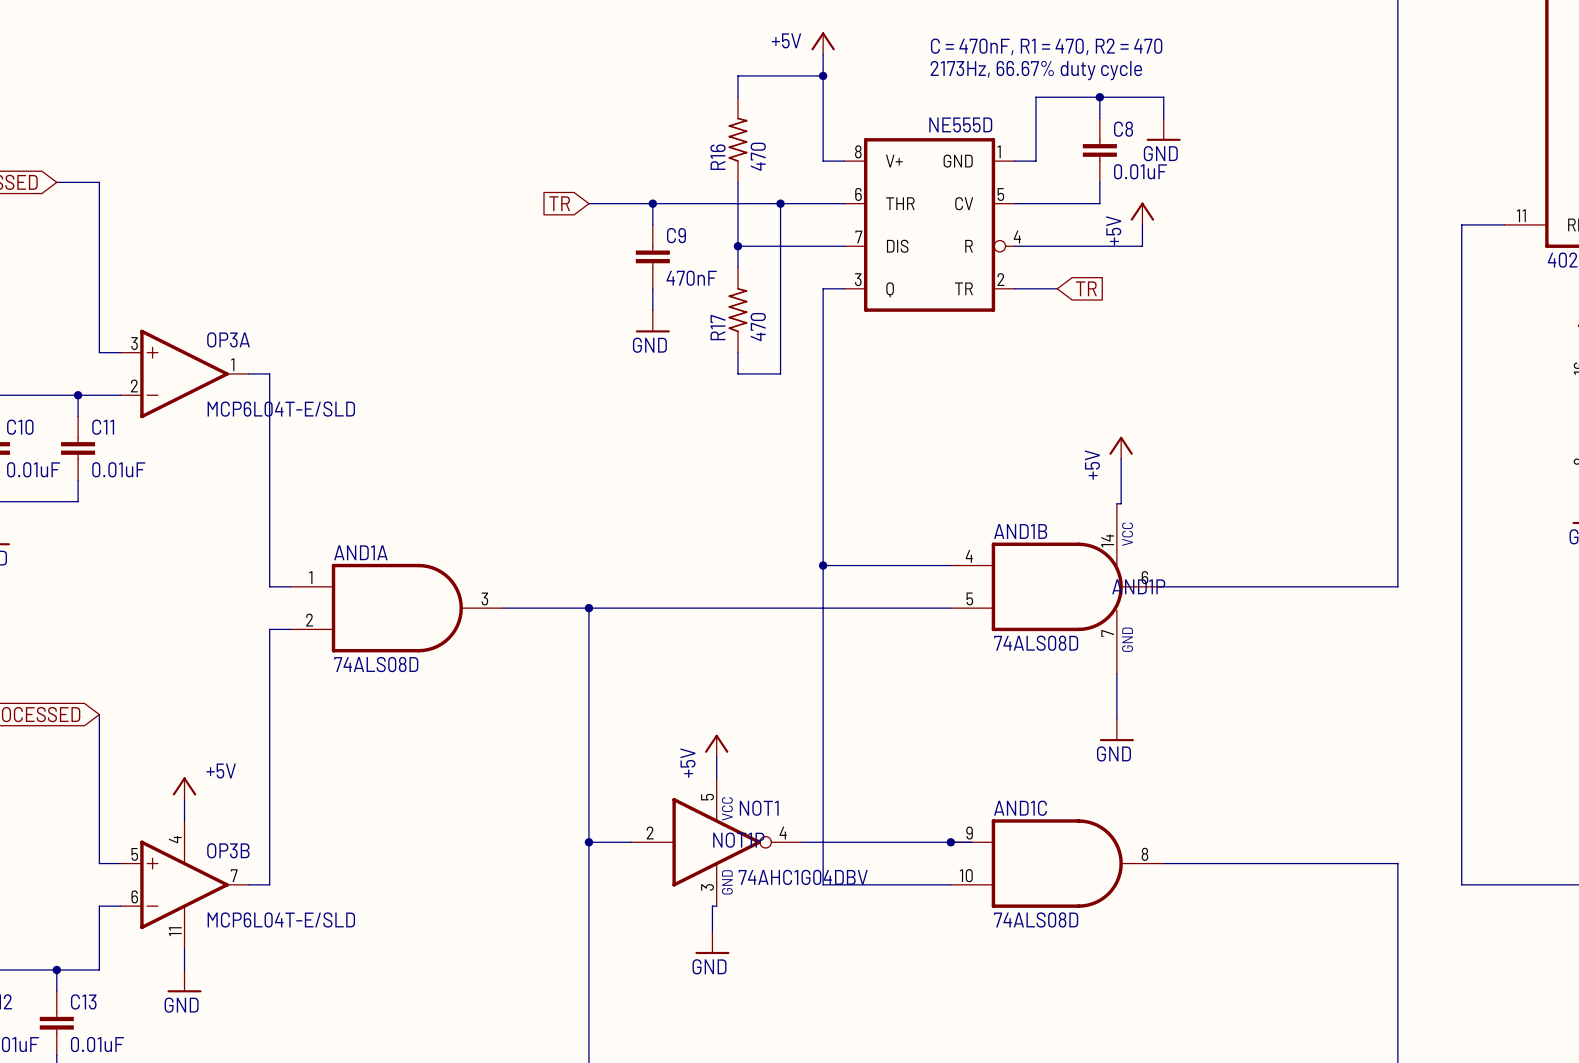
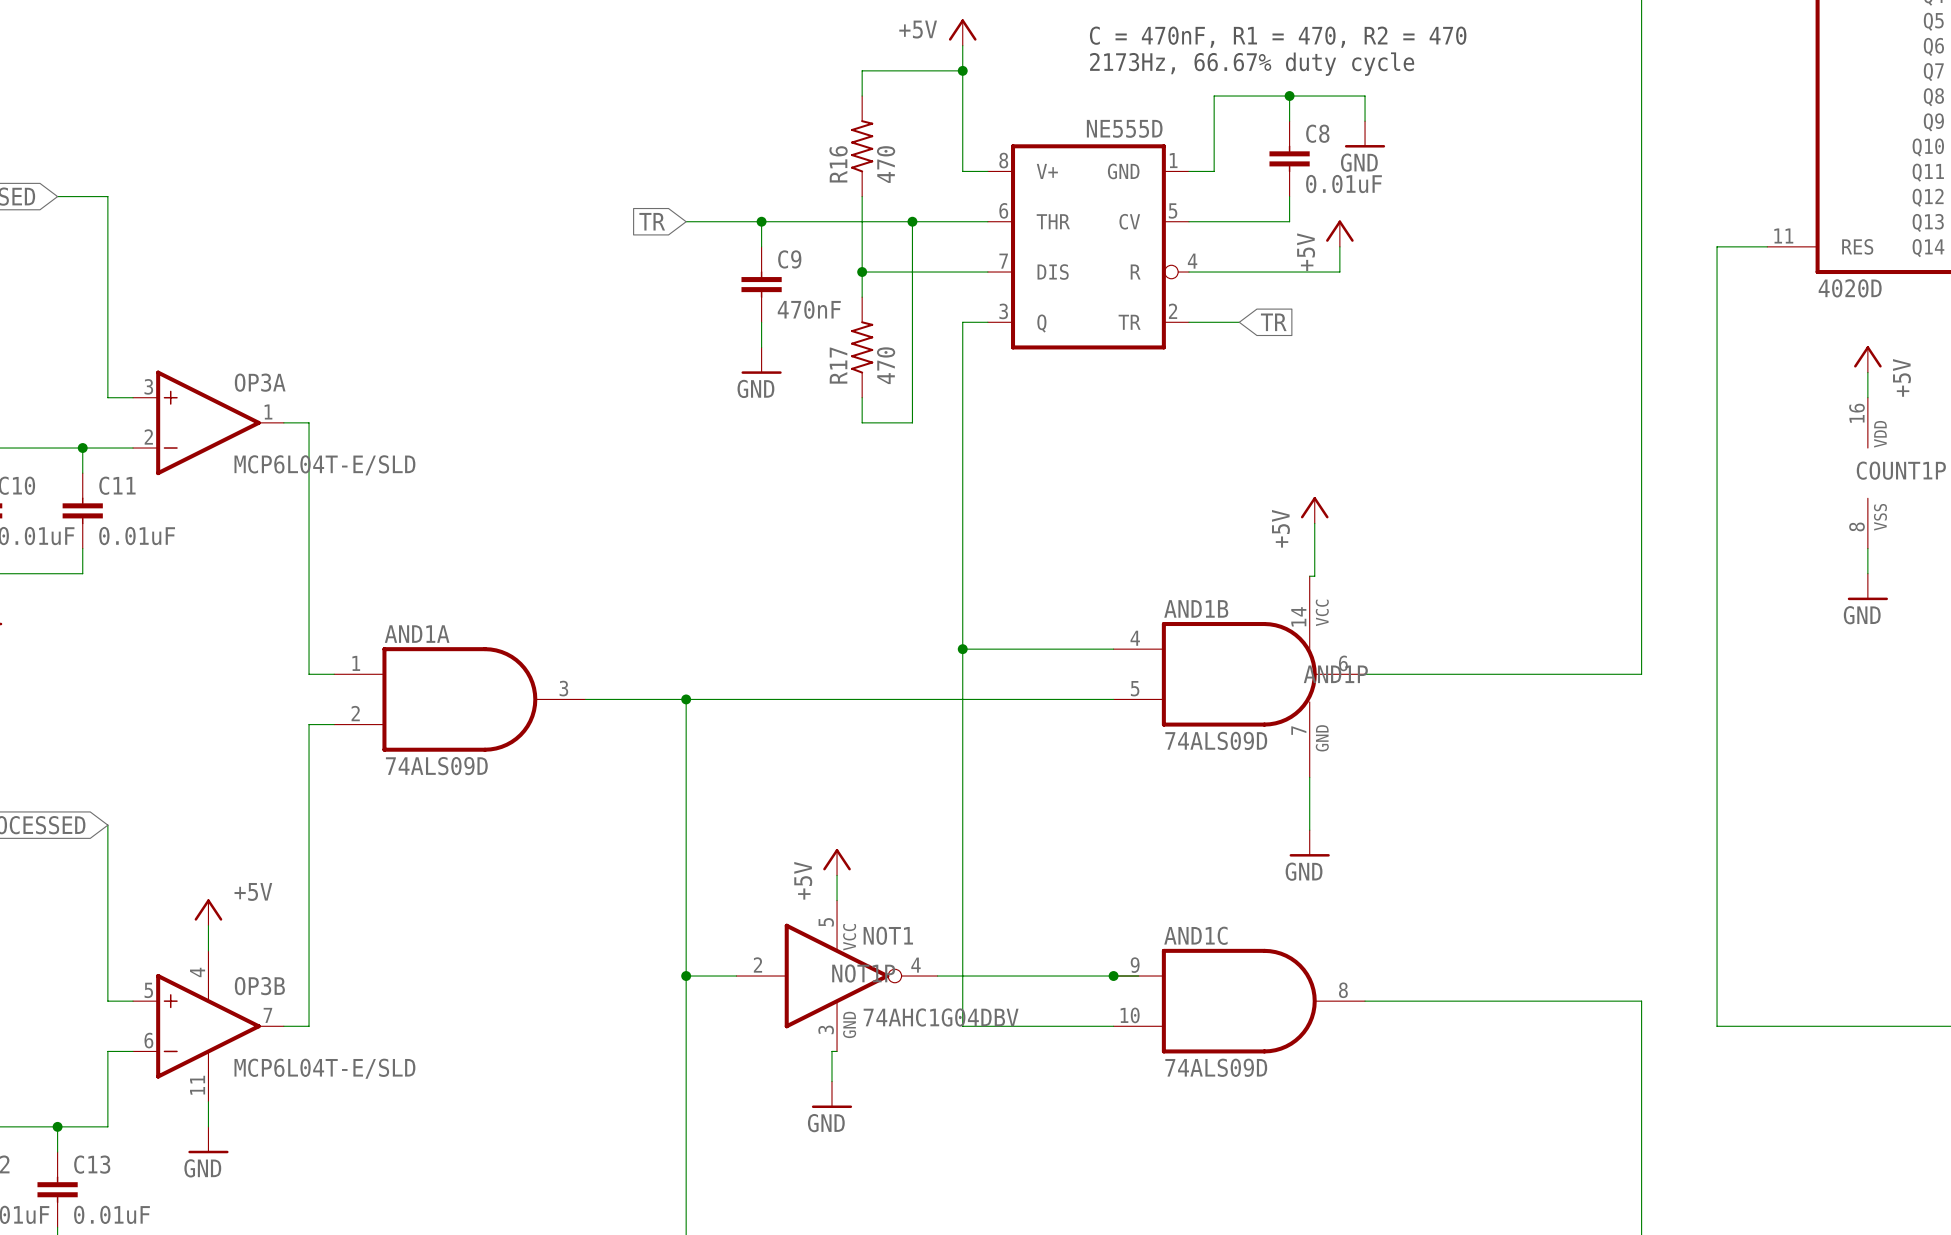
AND1B value: 74ALS08D (1036, 643) -> 74ALS09D (1216, 740)
AND1A value: 74ALS08D (376, 664) -> 74ALS09D (436, 766)
AND1C value: 74ALS08D (1036, 919) -> 74ALS09D (1216, 1067)

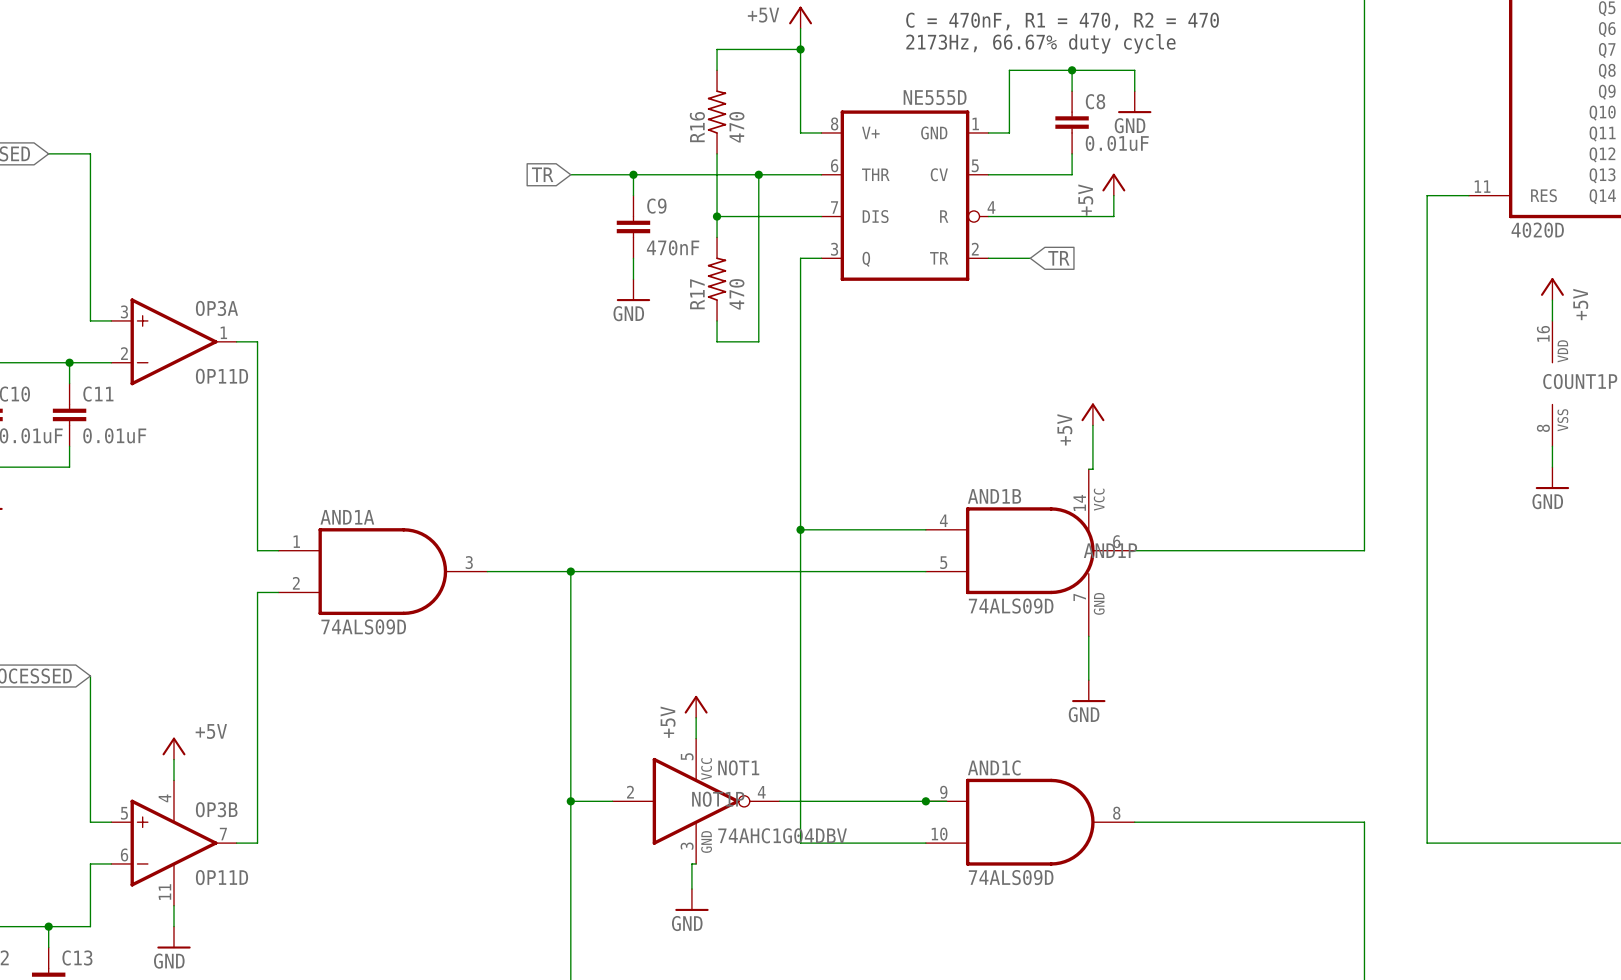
OP3A value: MCP6L04T-E/SLD (324, 465) -> OP11D (222, 376)
OP3B value: MCP6L04T-E/SLD (324, 1068) -> OP11D (222, 877)

